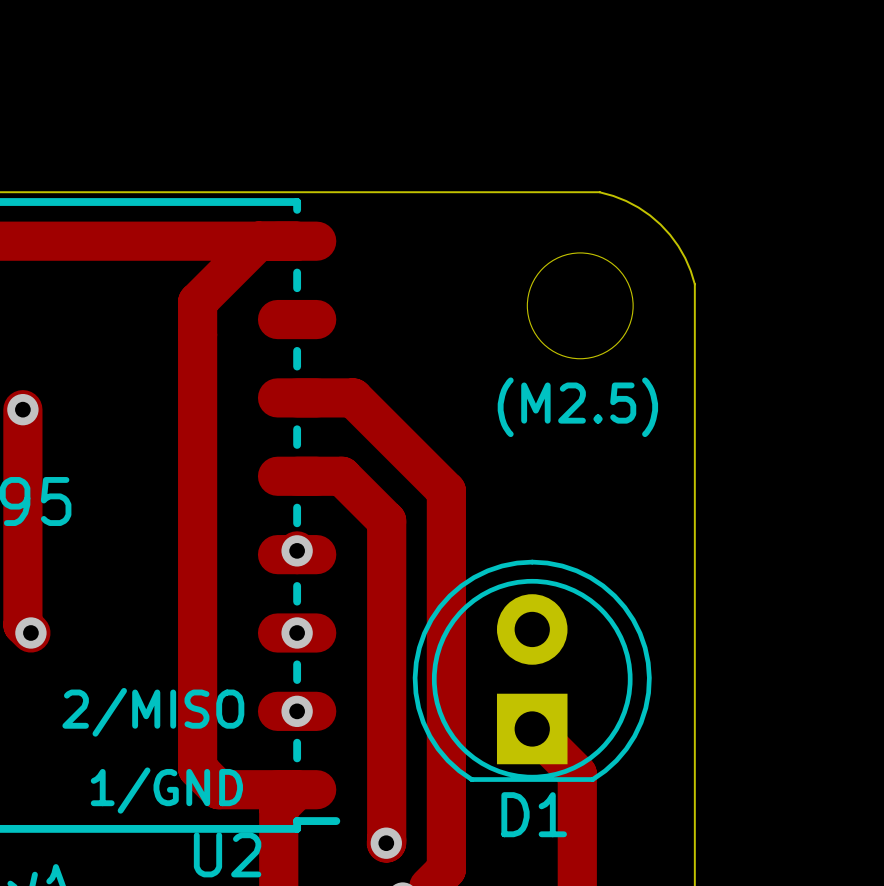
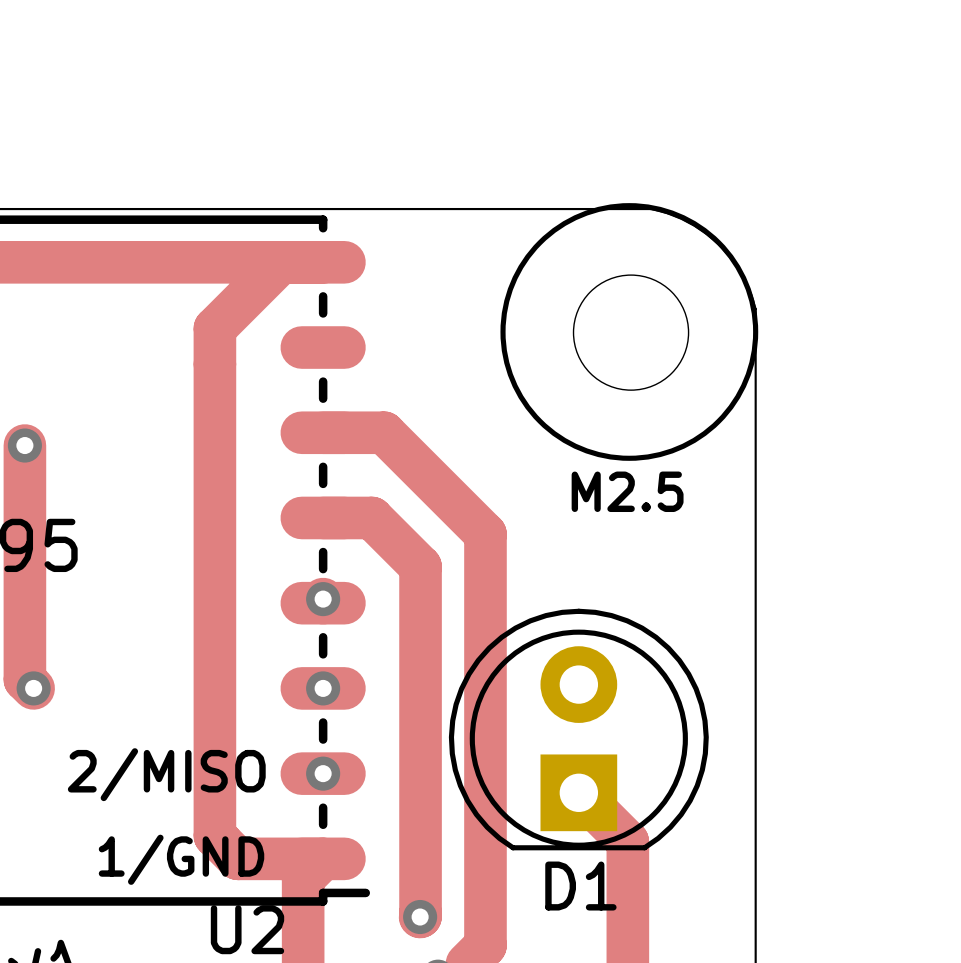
drawing: none -> [500, 203, 759, 461]
text: (M2.5) (577, 407) -> M2.5 (627, 491)

